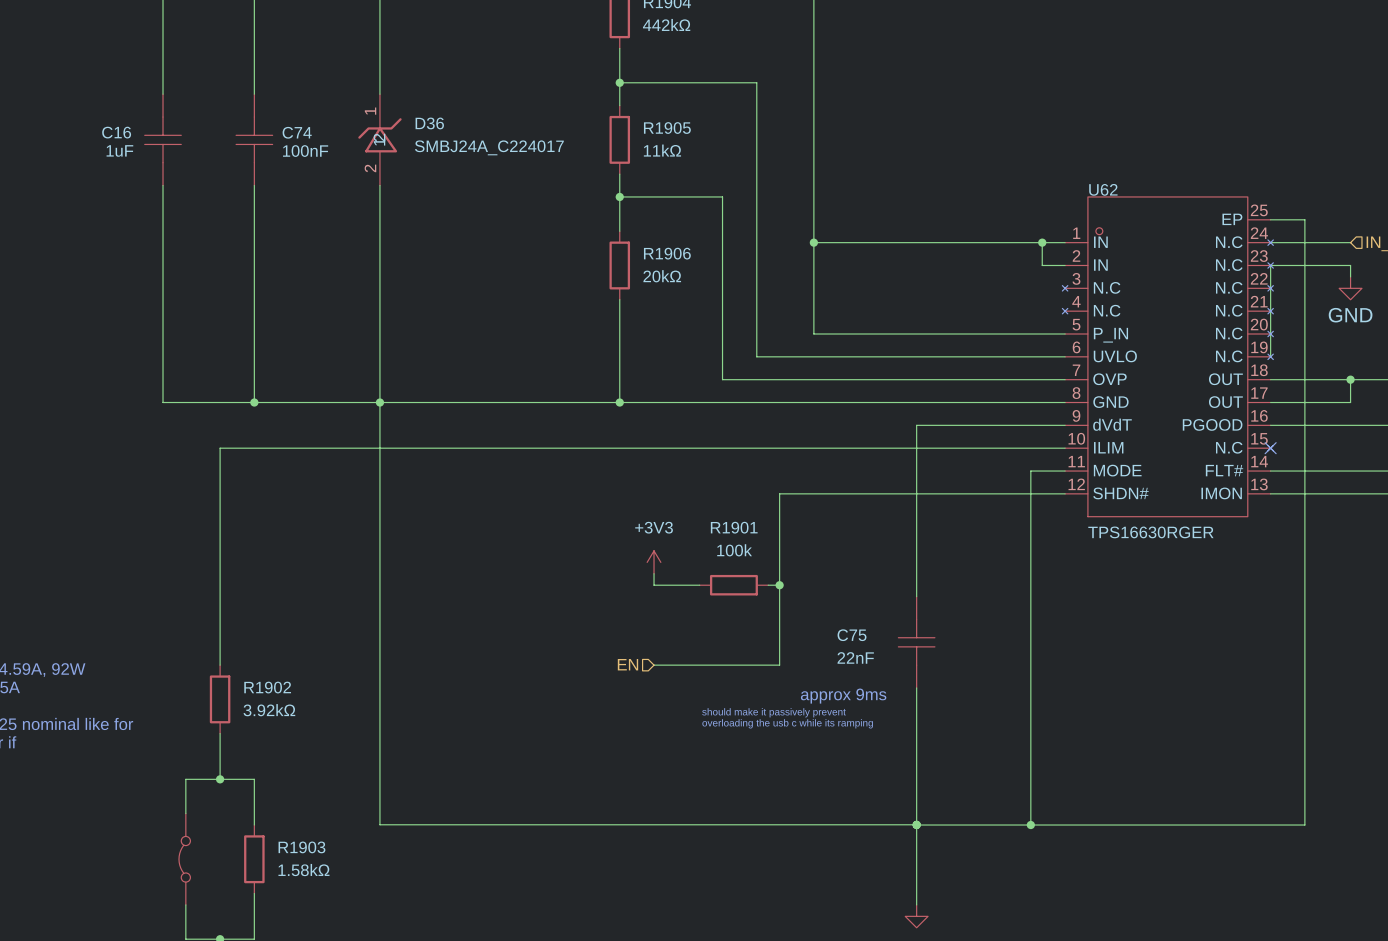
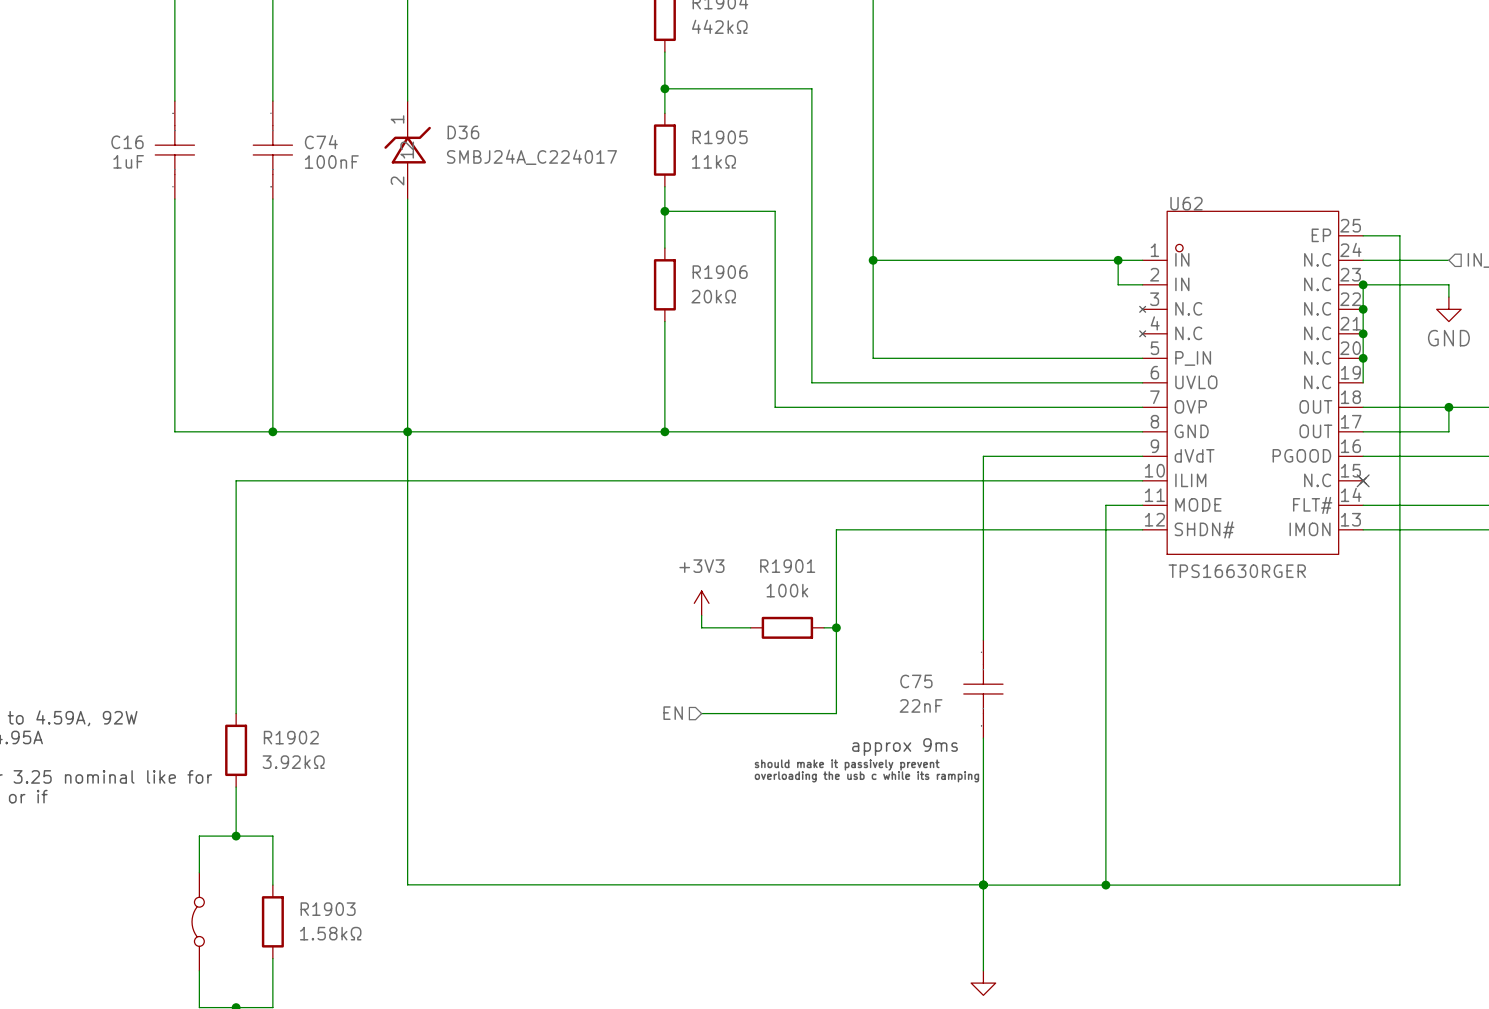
U62 symbol: [1062, 196, 1274, 517] -> [1139, 211, 1367, 555]
junction: none -> (1363, 284)
junction: none -> (1363, 309)
junction: none -> (1363, 333)
junction: none -> (1363, 358)

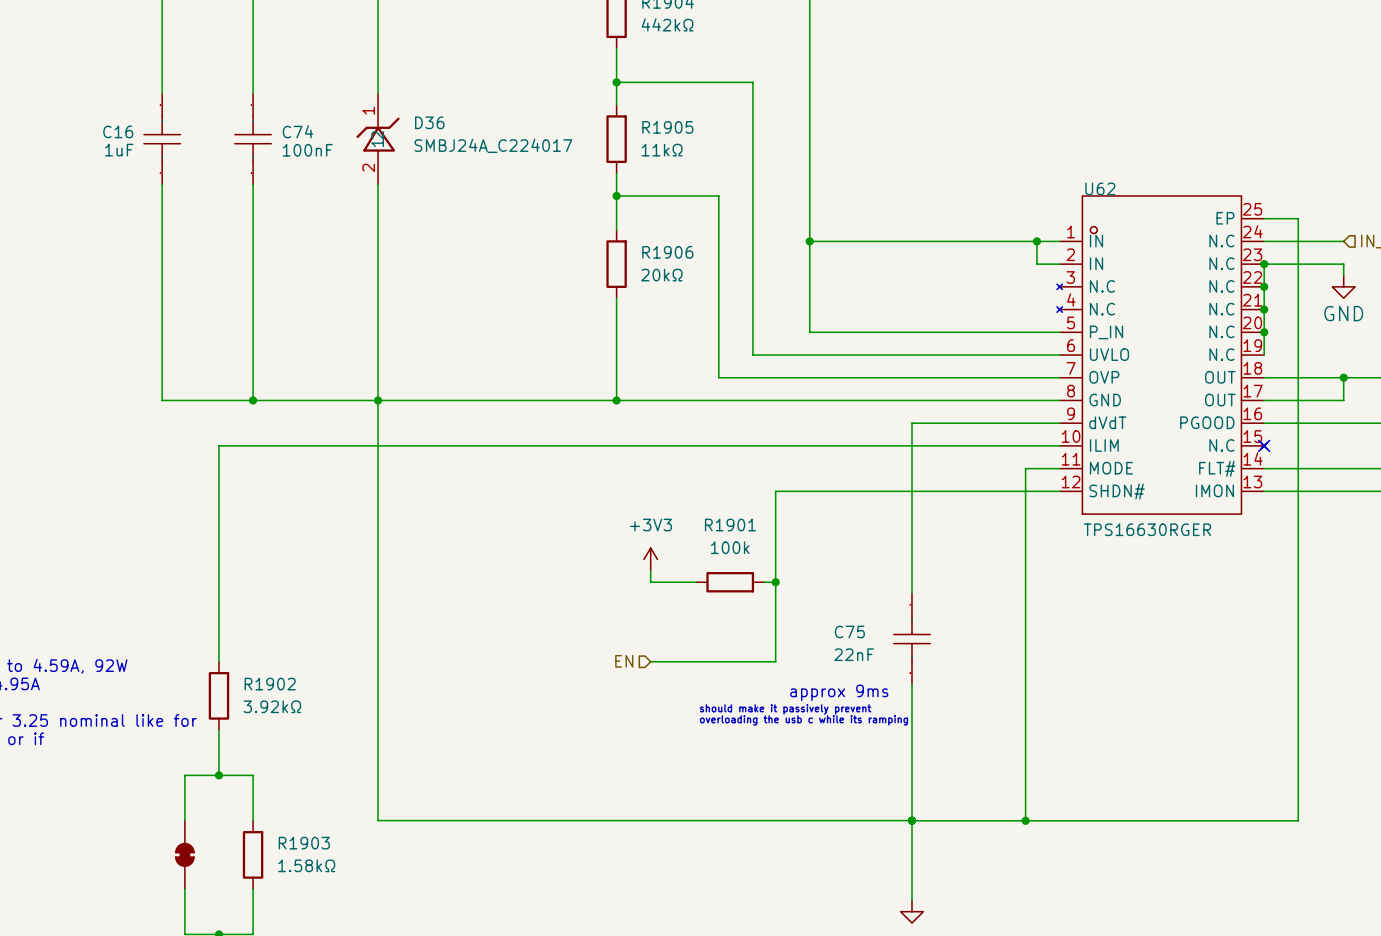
part symbol: [192, 872, 205, 971] -> [175, 820, 194, 889]

